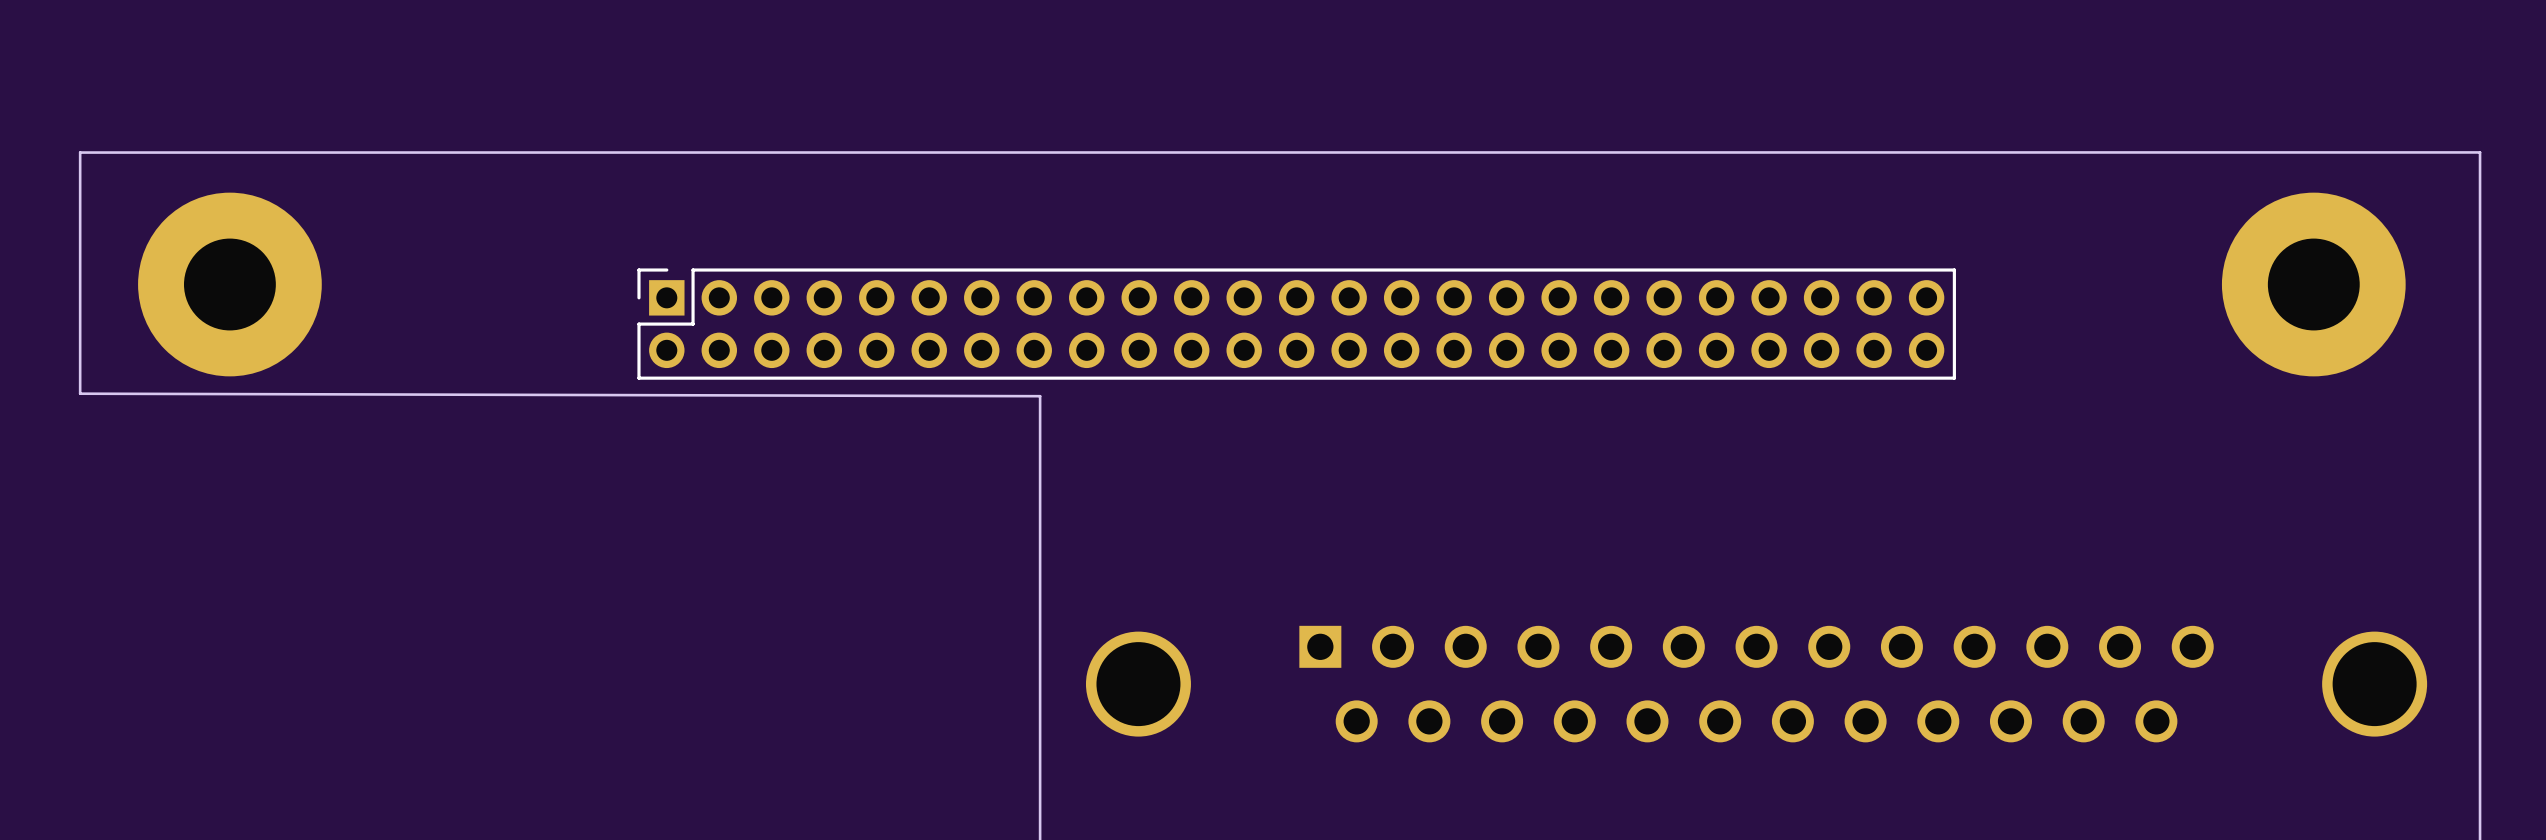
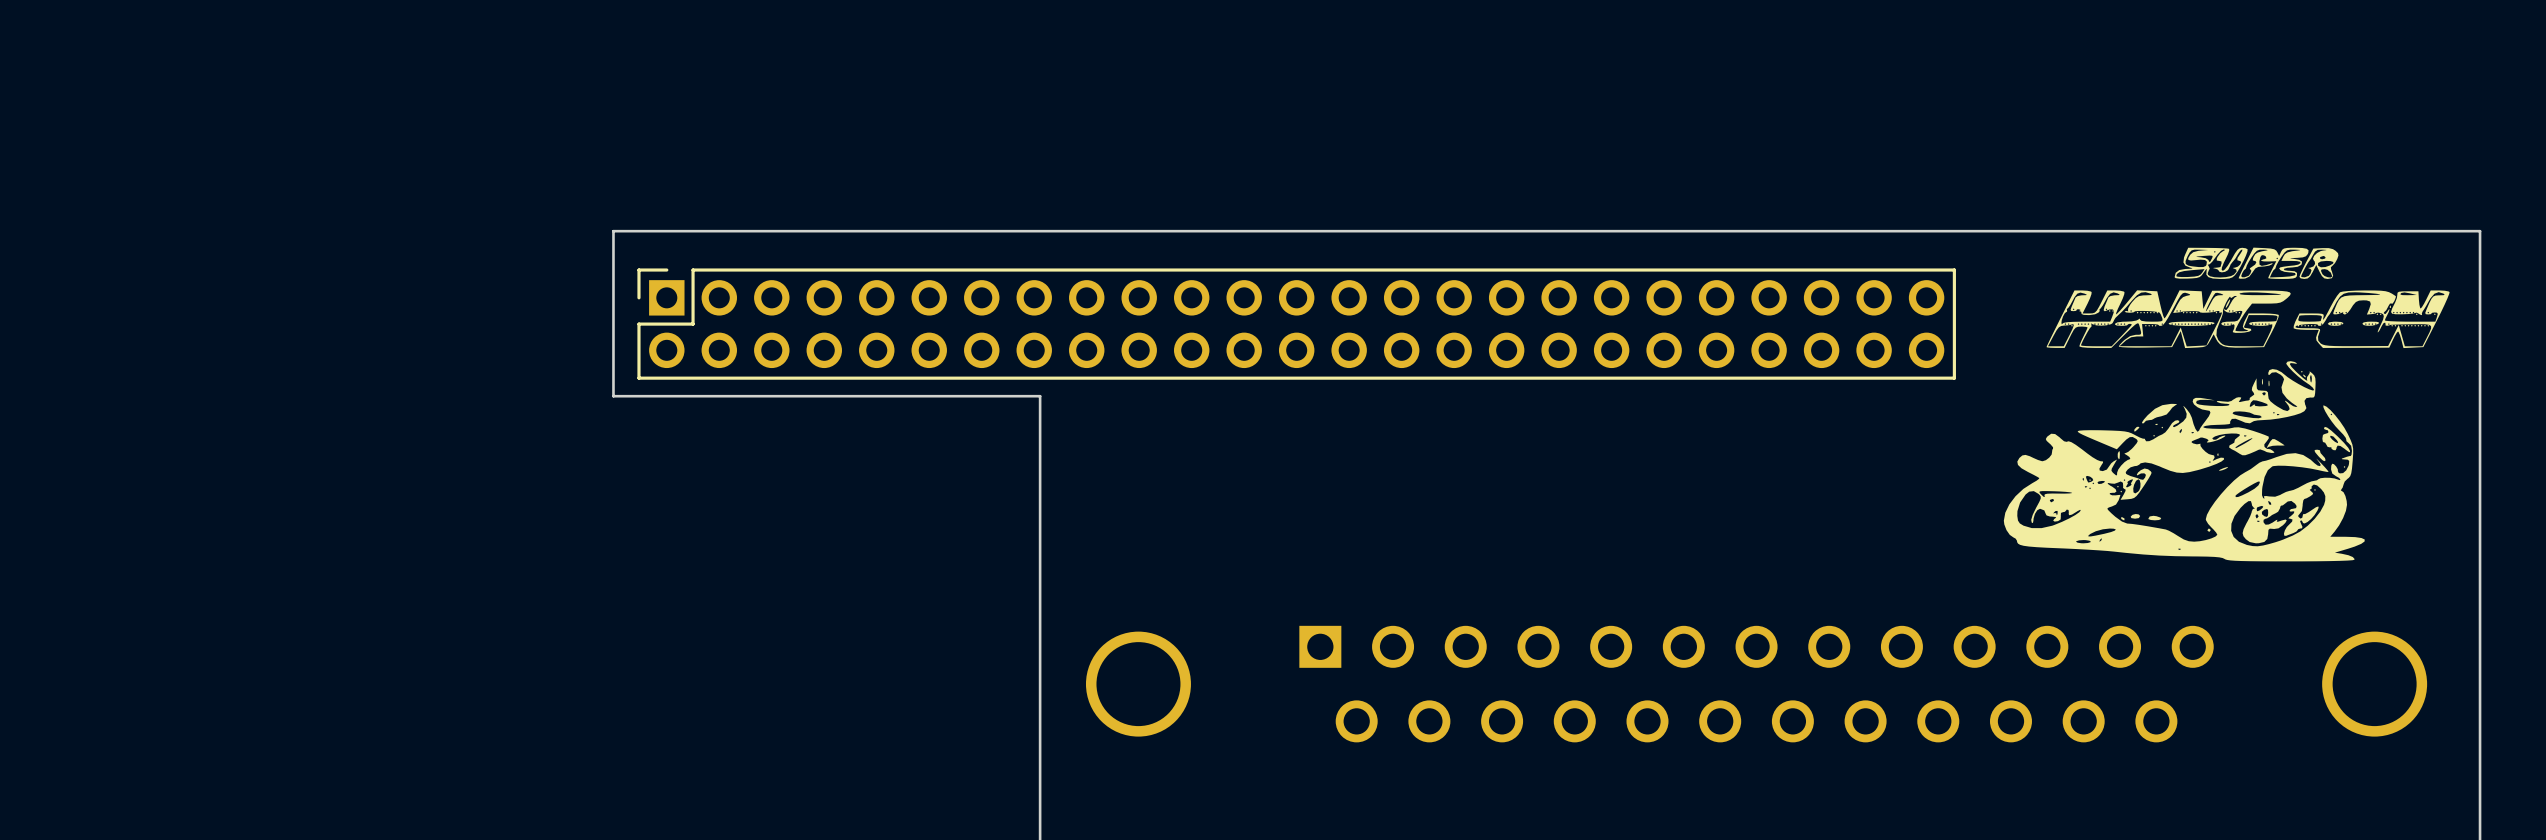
board edge: (2480, 231) (2480, 152) (80, 152) (80, 393) (1040, 396) -> (2480, 231) (613, 231) (613, 396) (1040, 396)
drawing: none -> [2003, 247, 2450, 562]
part: (229, 284) -> none
part: (2313, 284) -> none

